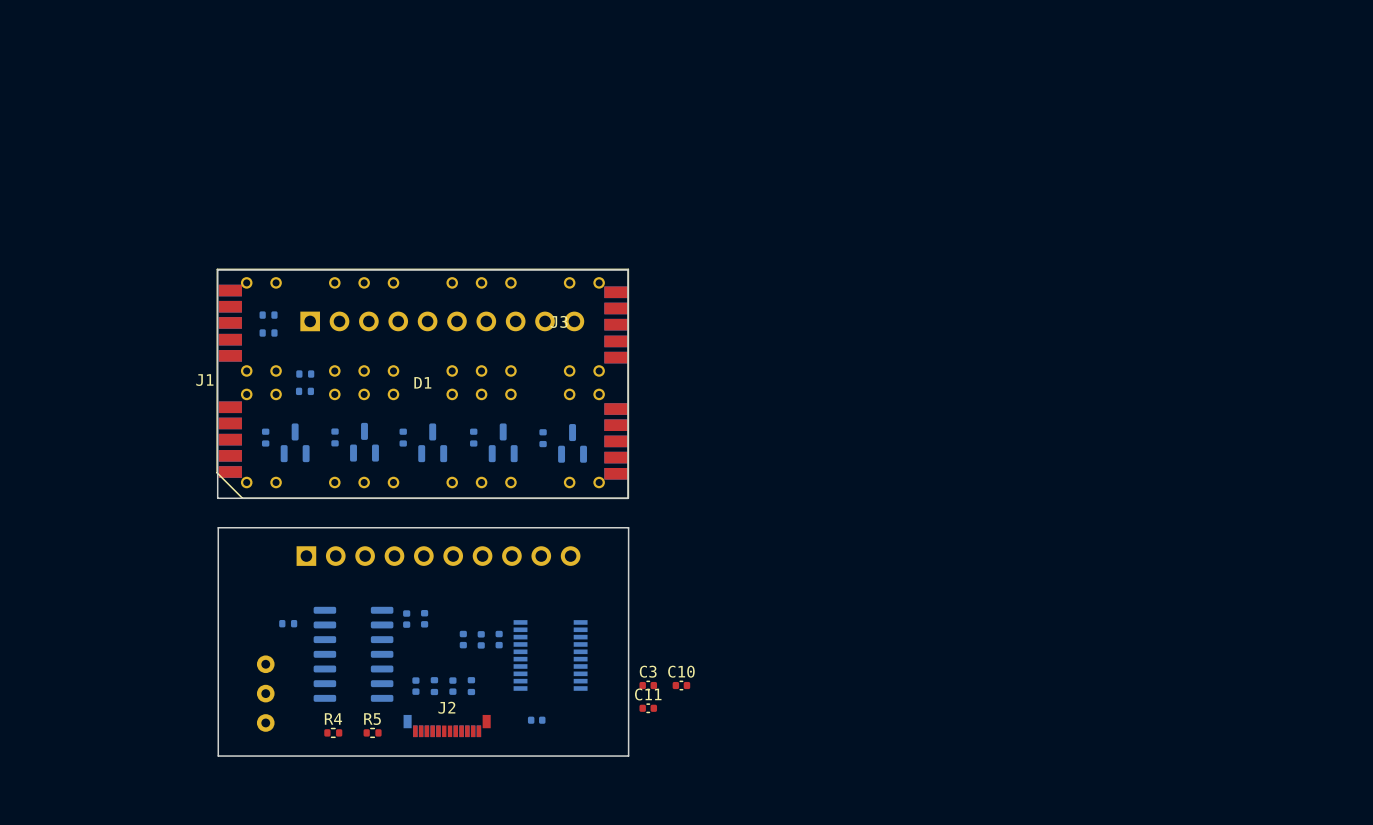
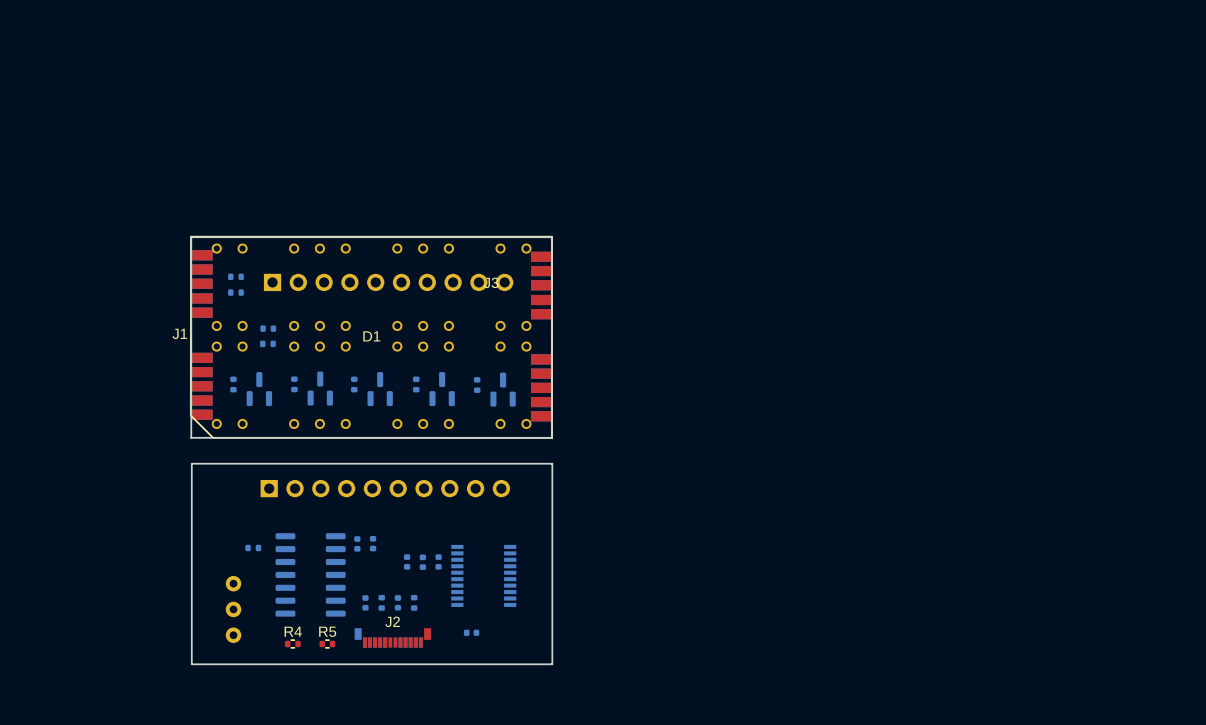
C3: (648, 685) -> none
C10: (681, 685) -> none
C11: (648, 708) -> none

